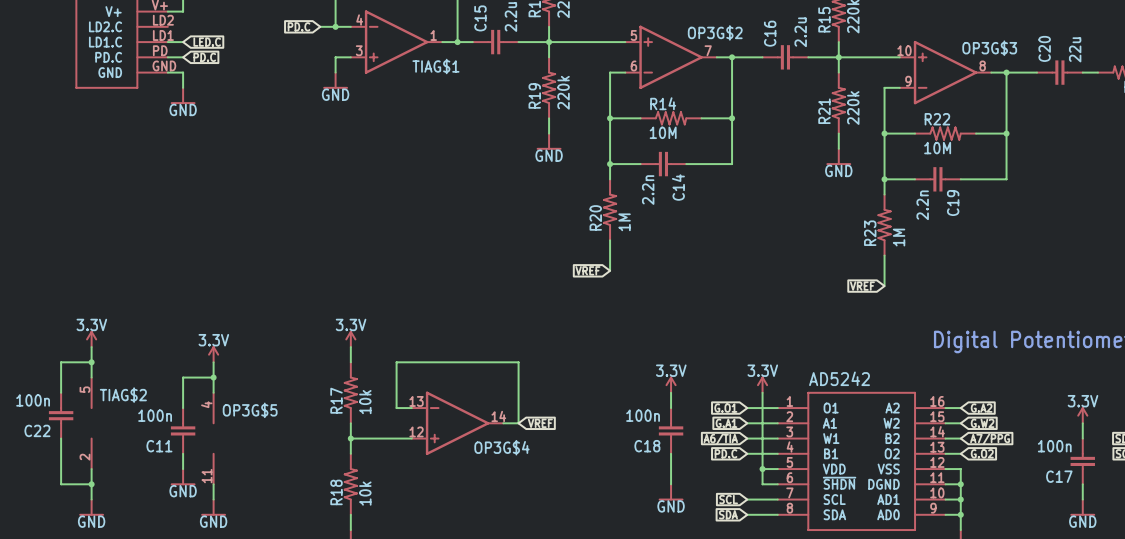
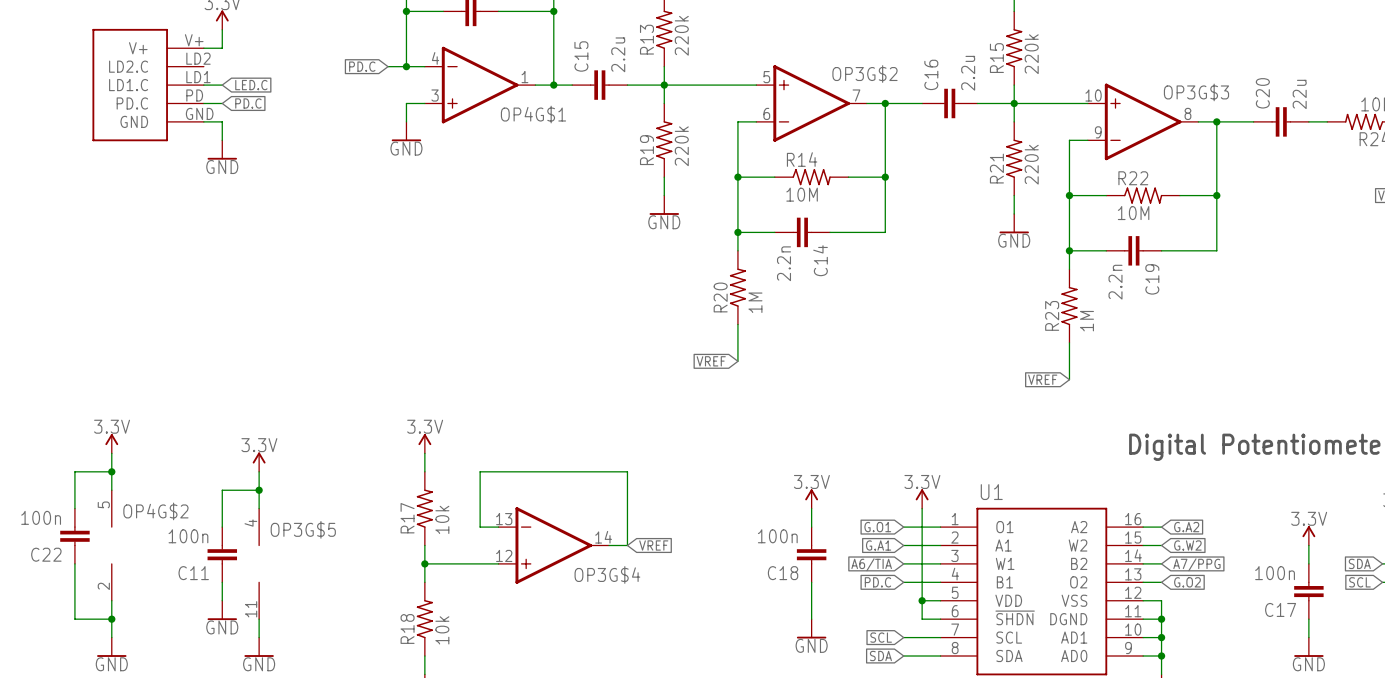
TIAG$1 name: TIAG$1 (435, 66) -> OP4G$1 (533, 114)
AD5242 name: AD5242 (839, 378) -> U1 (991, 492)
TIAG$2 name: TIAG$2 (123, 395) -> OP4G$2 (155, 511)

